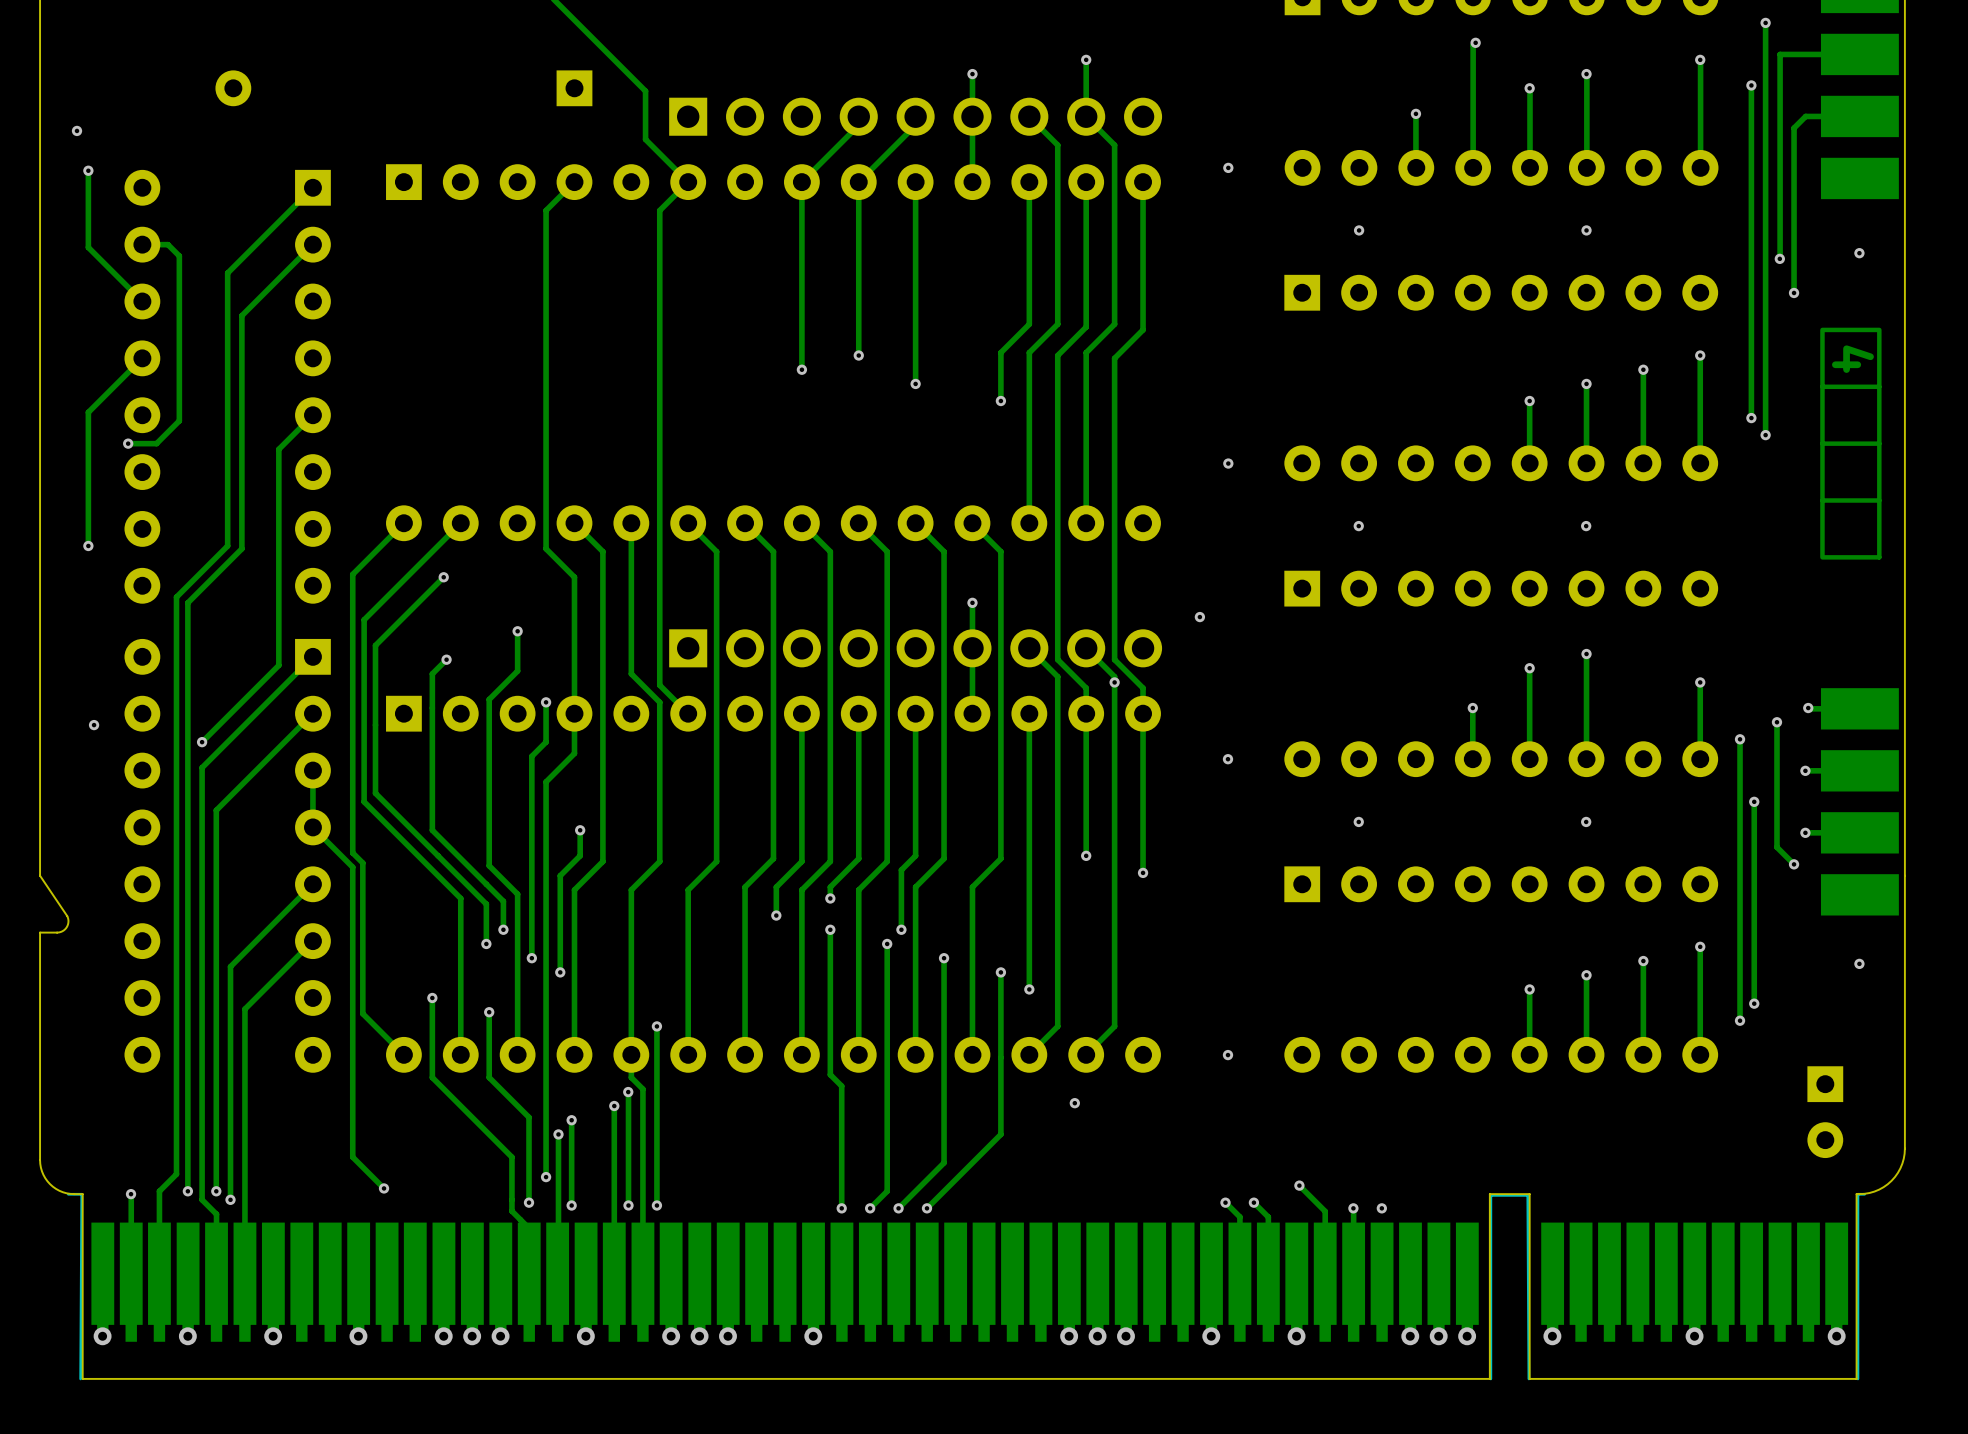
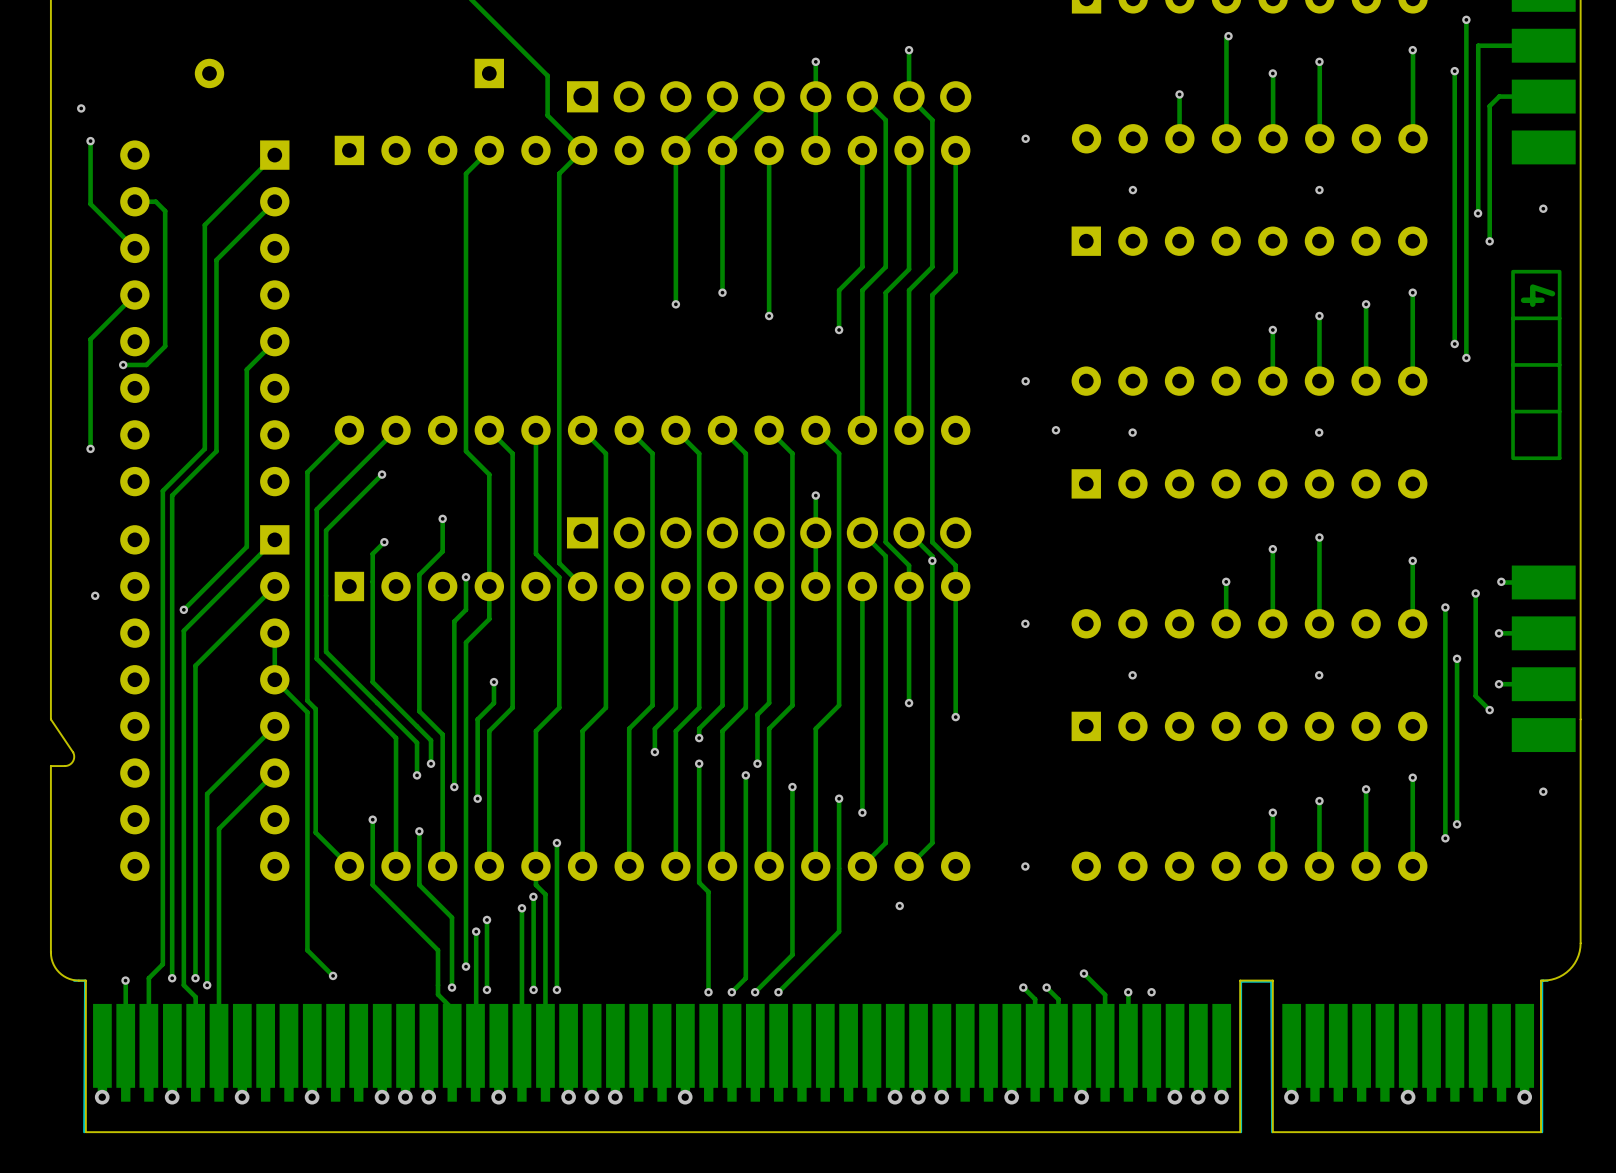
via position: (1199, 617) -> (1055, 430)
part: (1825, 1112) -> none

